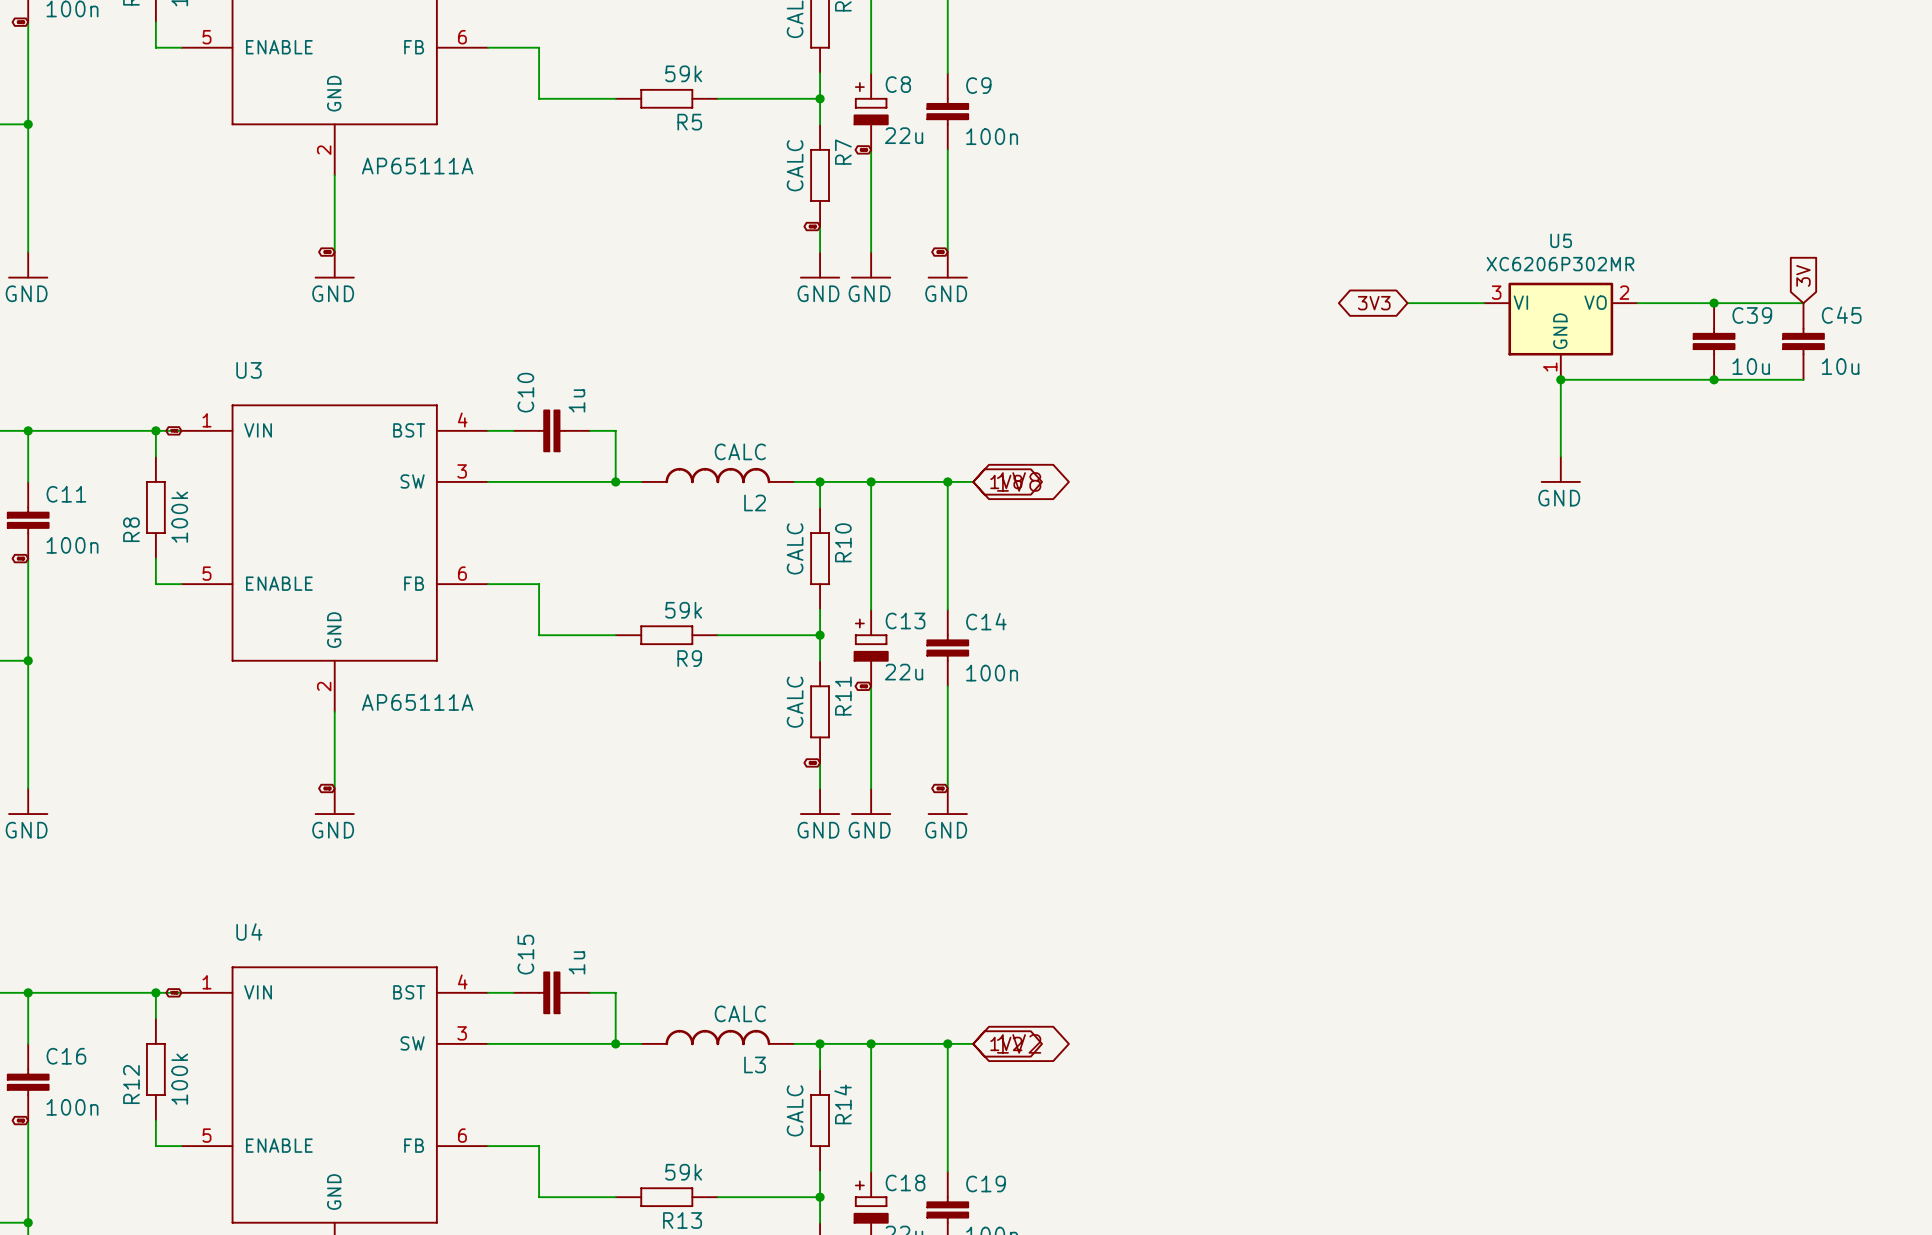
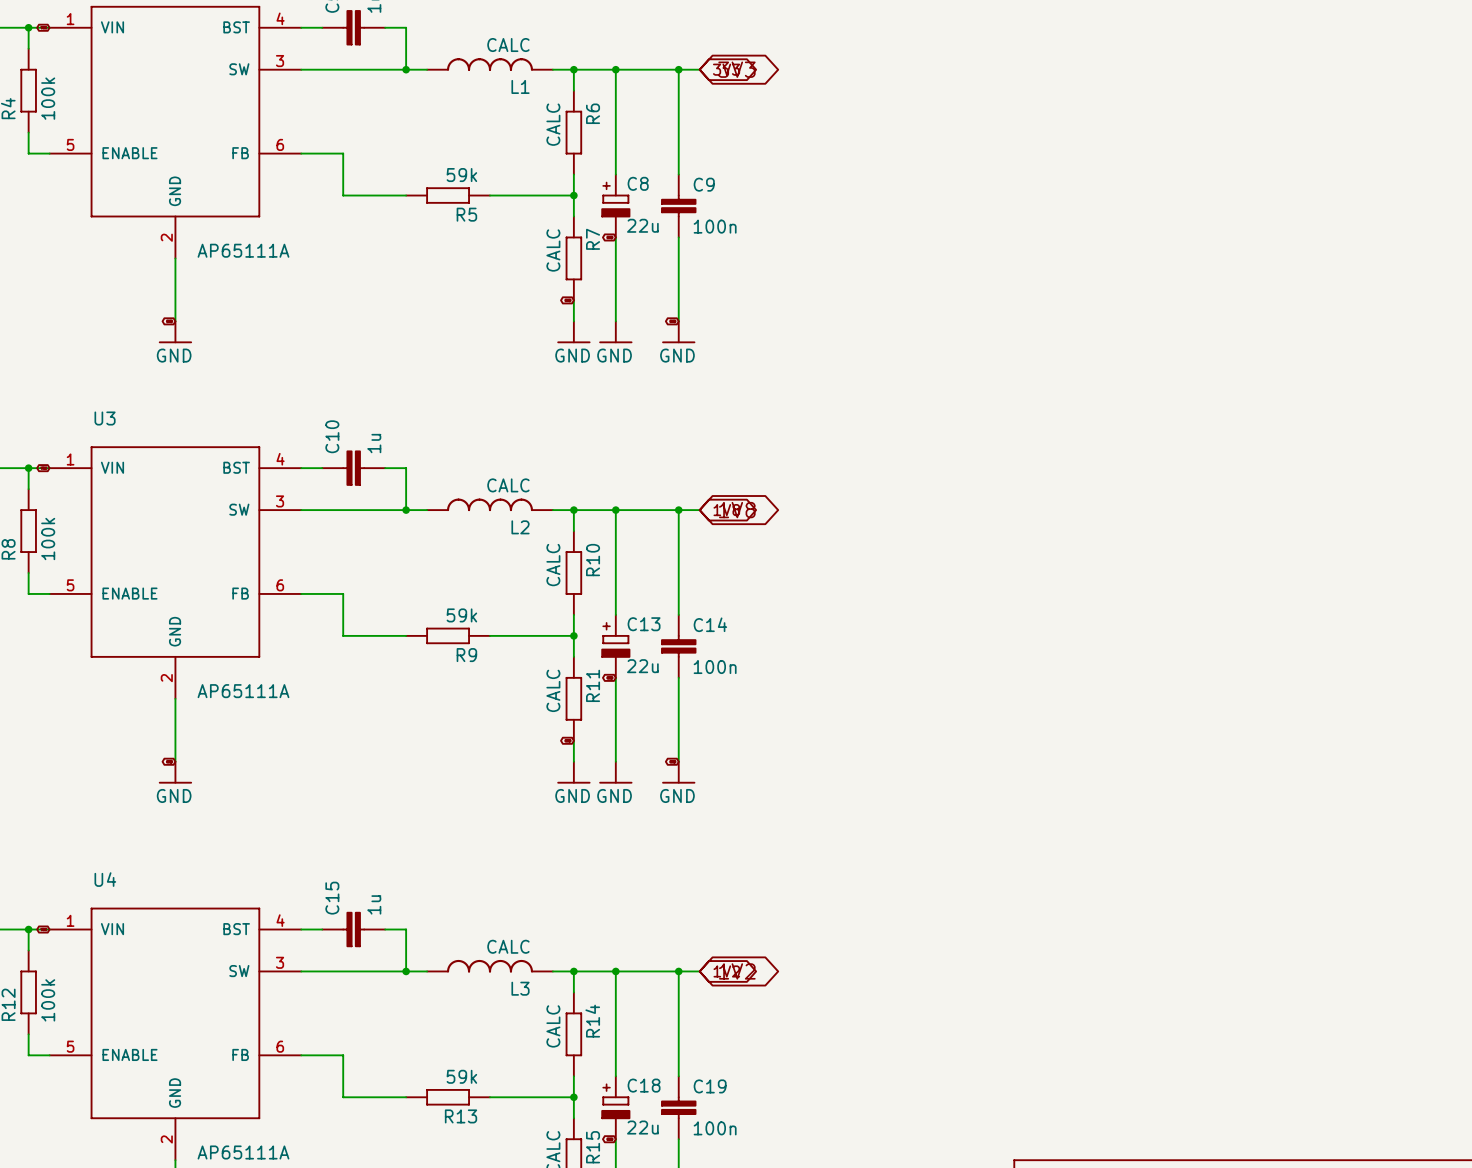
global label: 3V (1803, 275) -> none
global label: 3V3 (1374, 303) -> none
wire: (1407, 303) (1484, 303) -> none
wire: (1637, 303) (1803, 303) -> none
junction: (1714, 303) -> none
U5: XC6206P302MR (1560, 331) -> none
C39: 10u (1714, 341) -> none
C45: 10u (1803, 341) -> none
junction: (1560, 379) -> none
junction: (1714, 379) -> none
wire: (1803, 379) (1560, 379) (1560, 456) -> none
power symbol: GND (1560, 469) -> none

